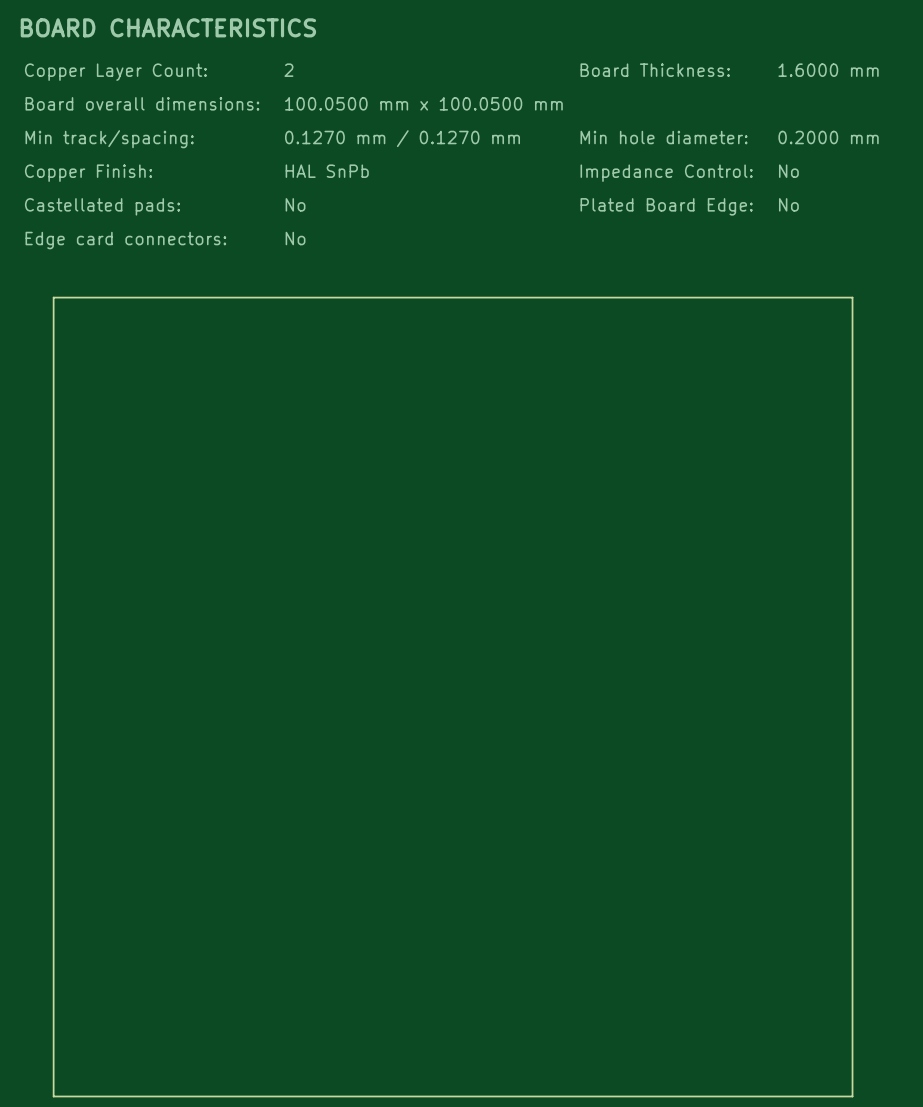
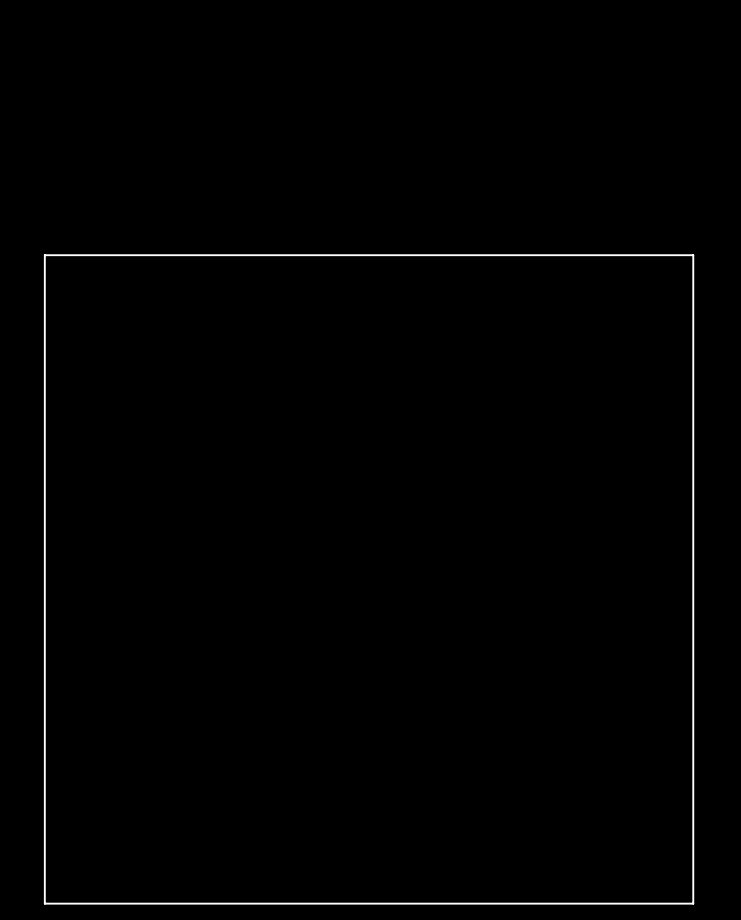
text: BOARD CHARACTERISTICS (168, 27) -> none
text: 2 (288, 70) -> none
text: Board Thickness: (655, 70) -> none
text: 1.6000 mm (828, 70) -> none
text: Copper Layer Count: (115, 72) -> none
text: Board overall dimensions: (142, 103) -> none
text: 100.0500 mm x 100.0500 mm (423, 103) -> none
text: Min hole diameter: (664, 137) -> none
text: 0.2000 mm (828, 137) -> none
text: 0.1270 mm / 0.1270 mm (402, 138) -> none
text: Min track/spacing: (109, 139) -> none
text: HAL SnPb (327, 171) -> none
text: No (788, 171) -> none
text: Copper Finish: (88, 173) -> none
text: Impedance Control: (666, 173) -> none
text: No (295, 204) -> none
text: No (788, 204) -> none
text: Castellated pads: (102, 206) -> none
text: Plated Board Edge: (666, 206) -> none
text: No (295, 238) -> none
text: Edge card connectors: (125, 240) -> none

